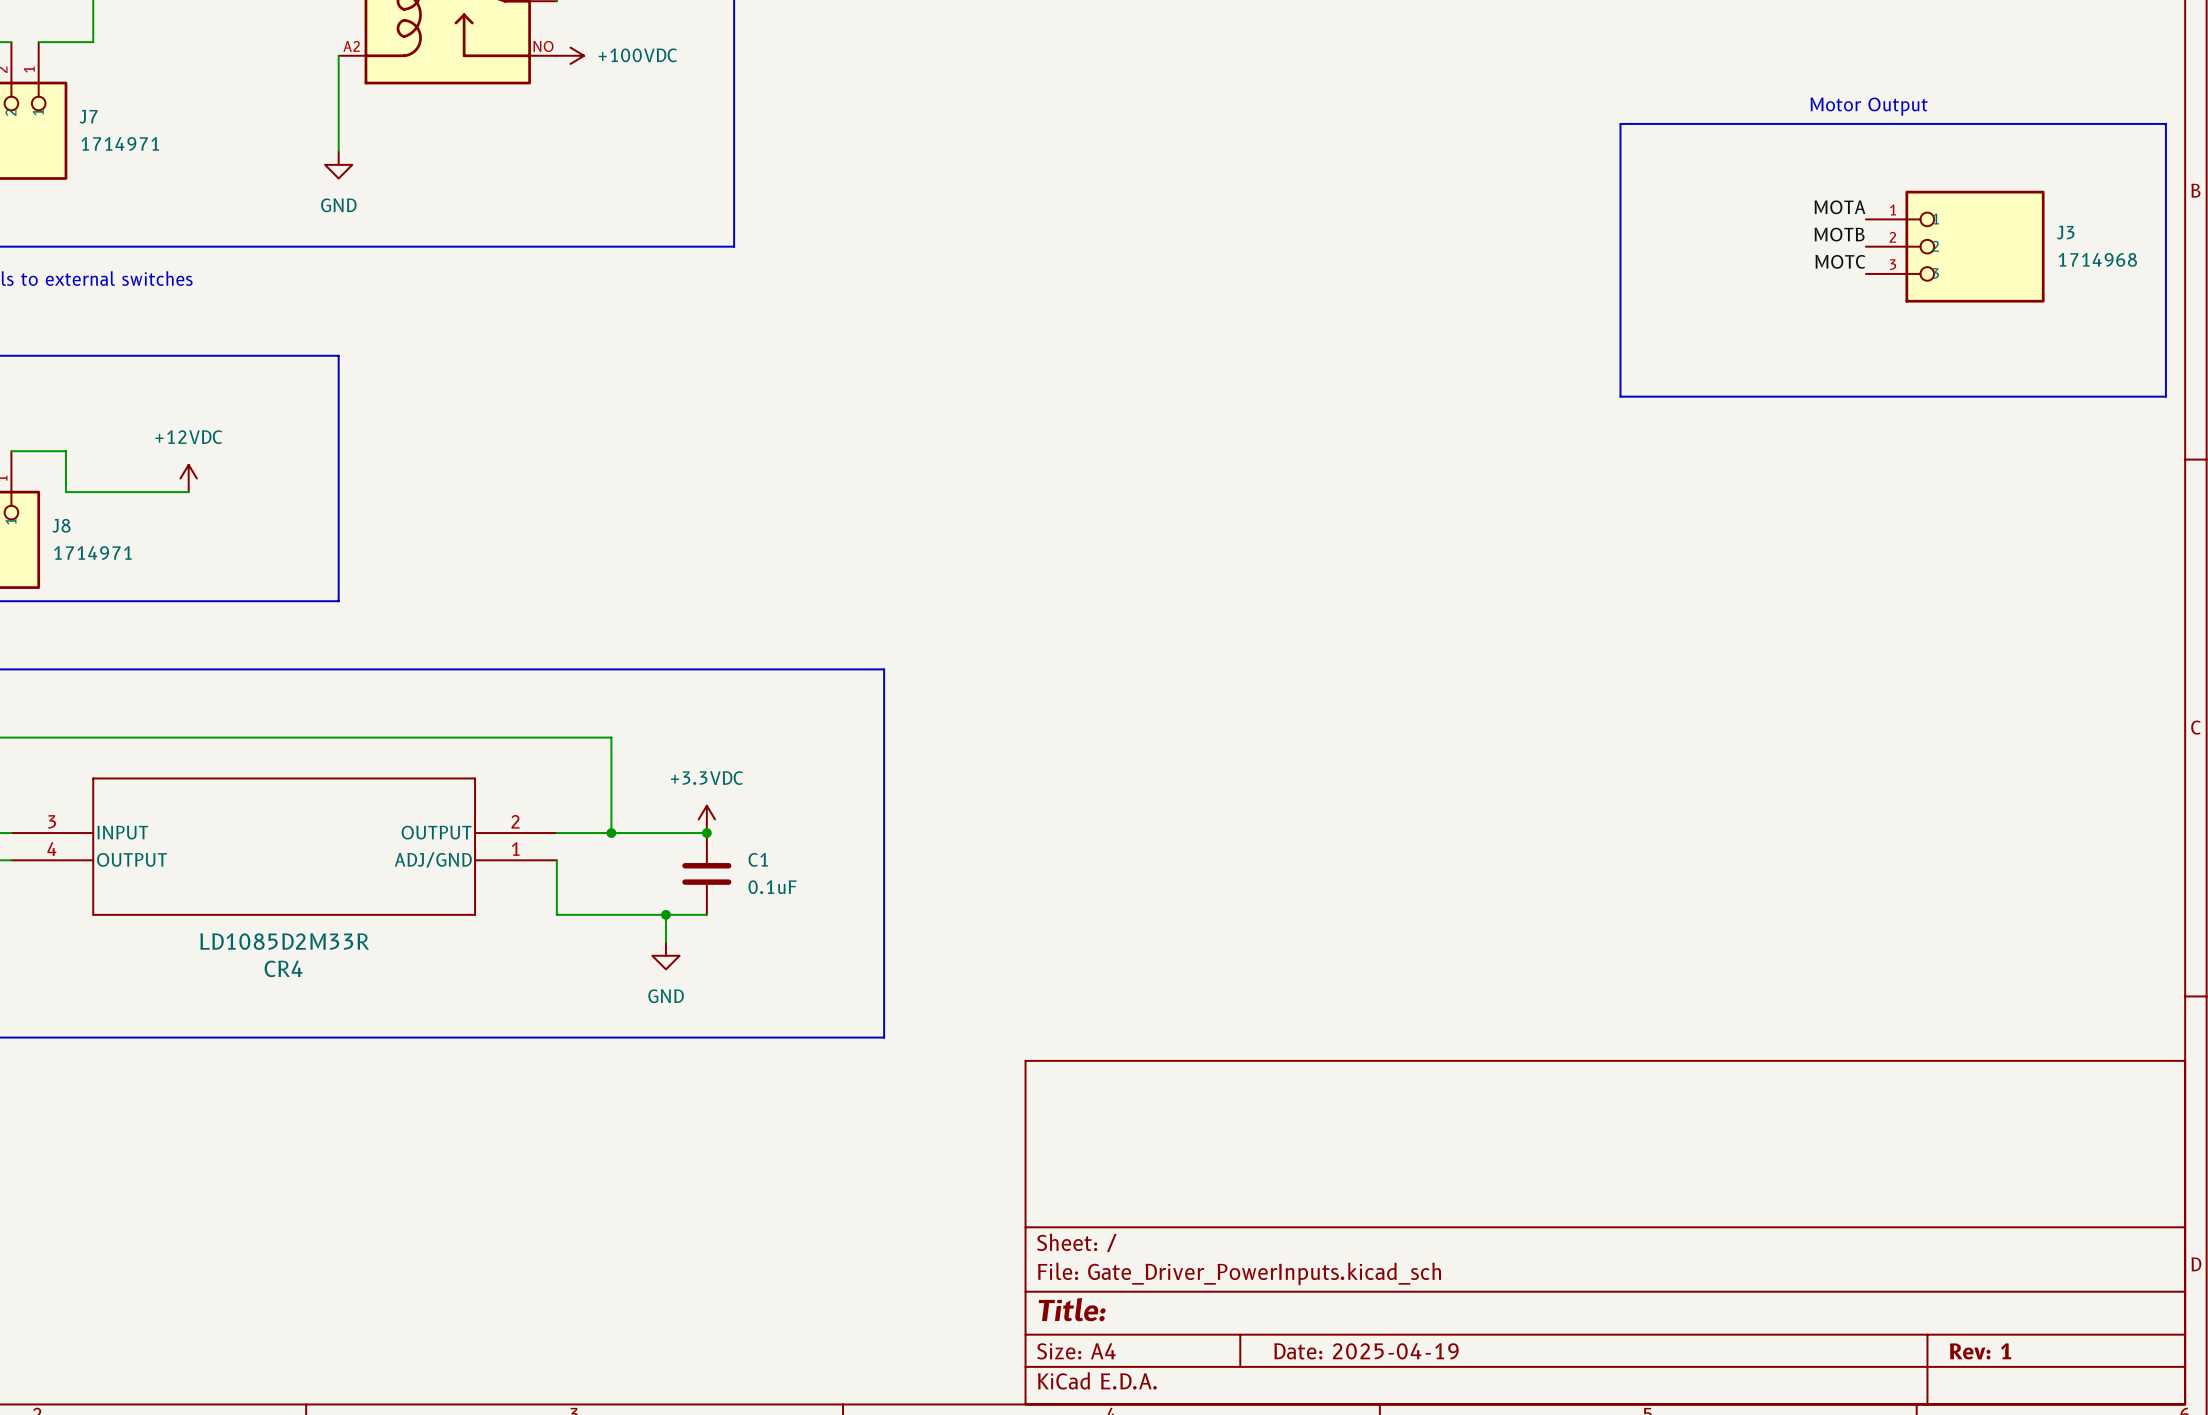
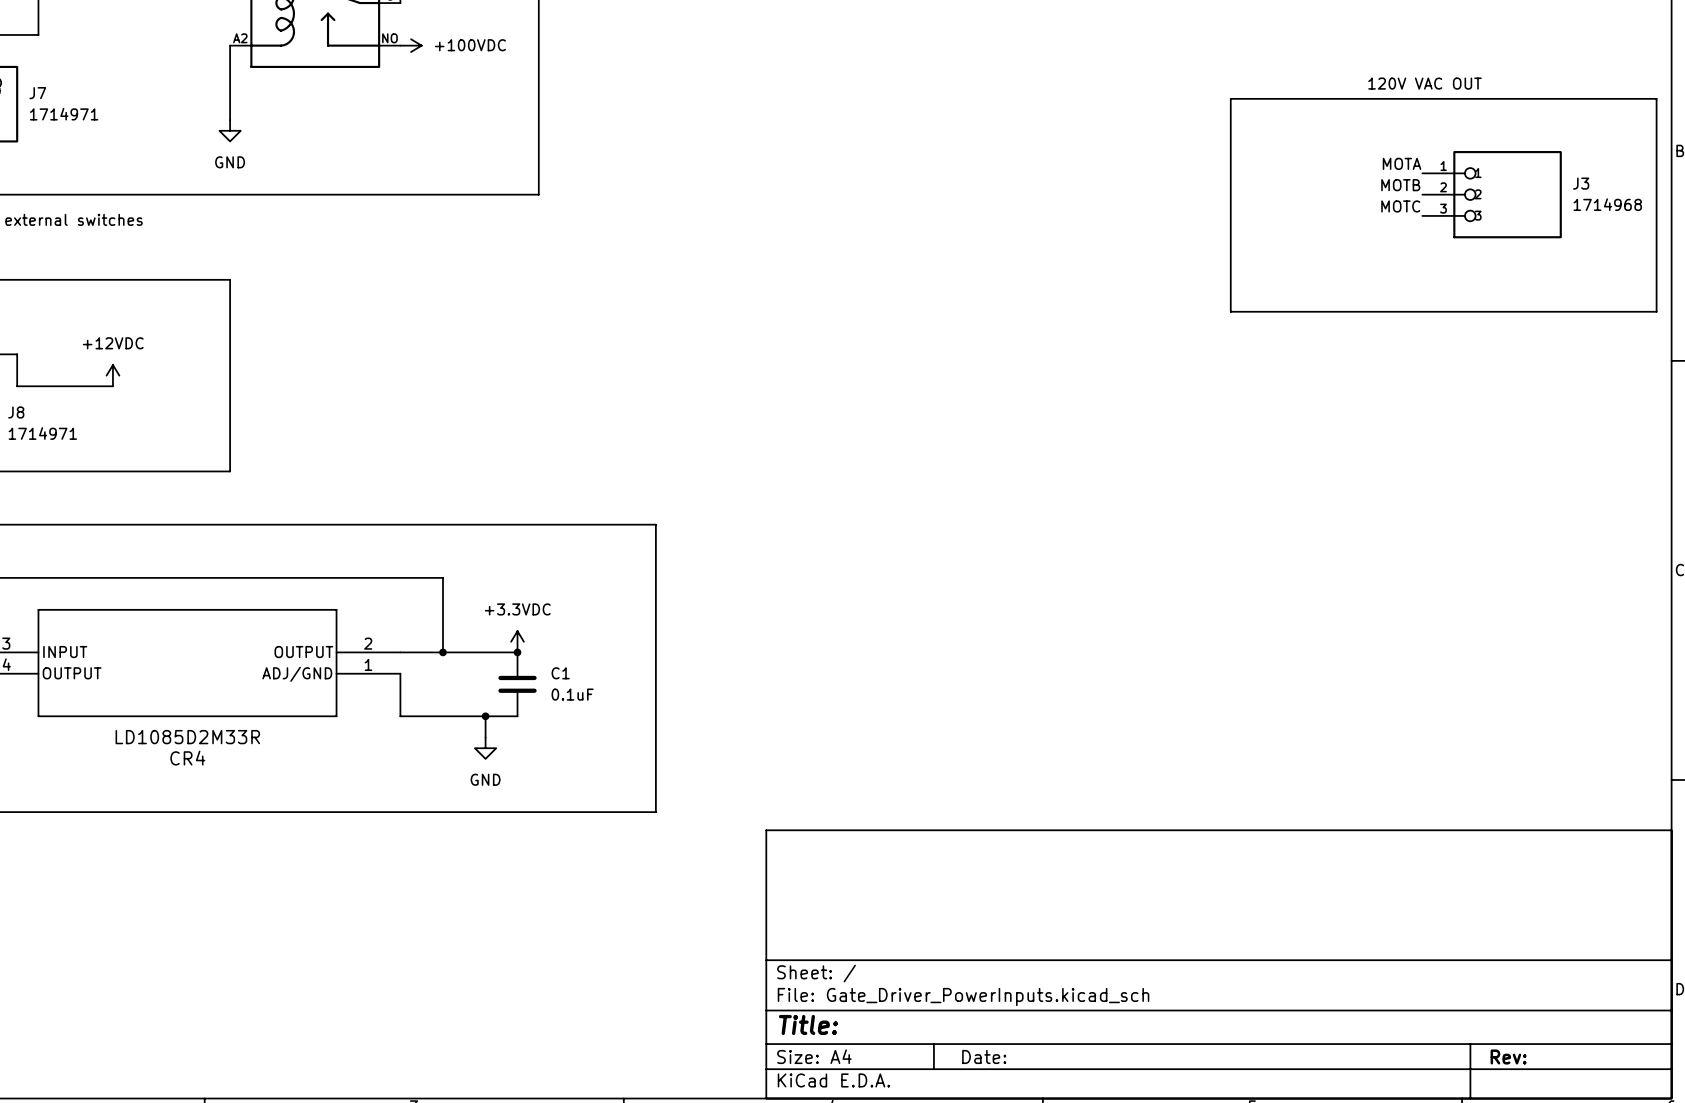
text: Motor Output (1869, 106) -> 120V VAC OUT (1425, 83)
title block: Date: 2025-04-19 (1366, 1351) -> Date: (984, 1056)
title block: Rev: 1 (1980, 1351) -> Rev: (1508, 1056)

